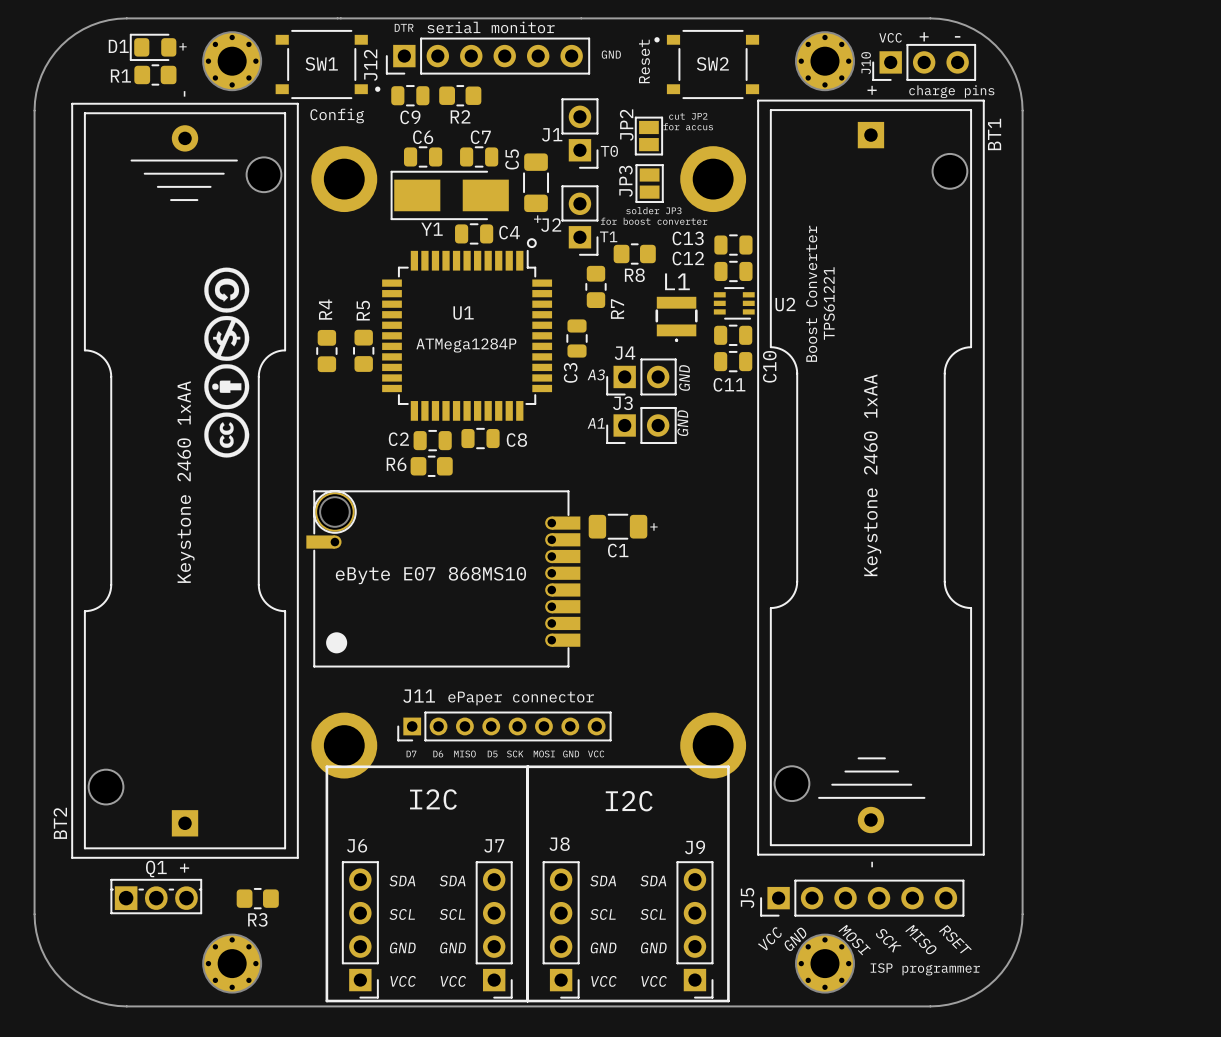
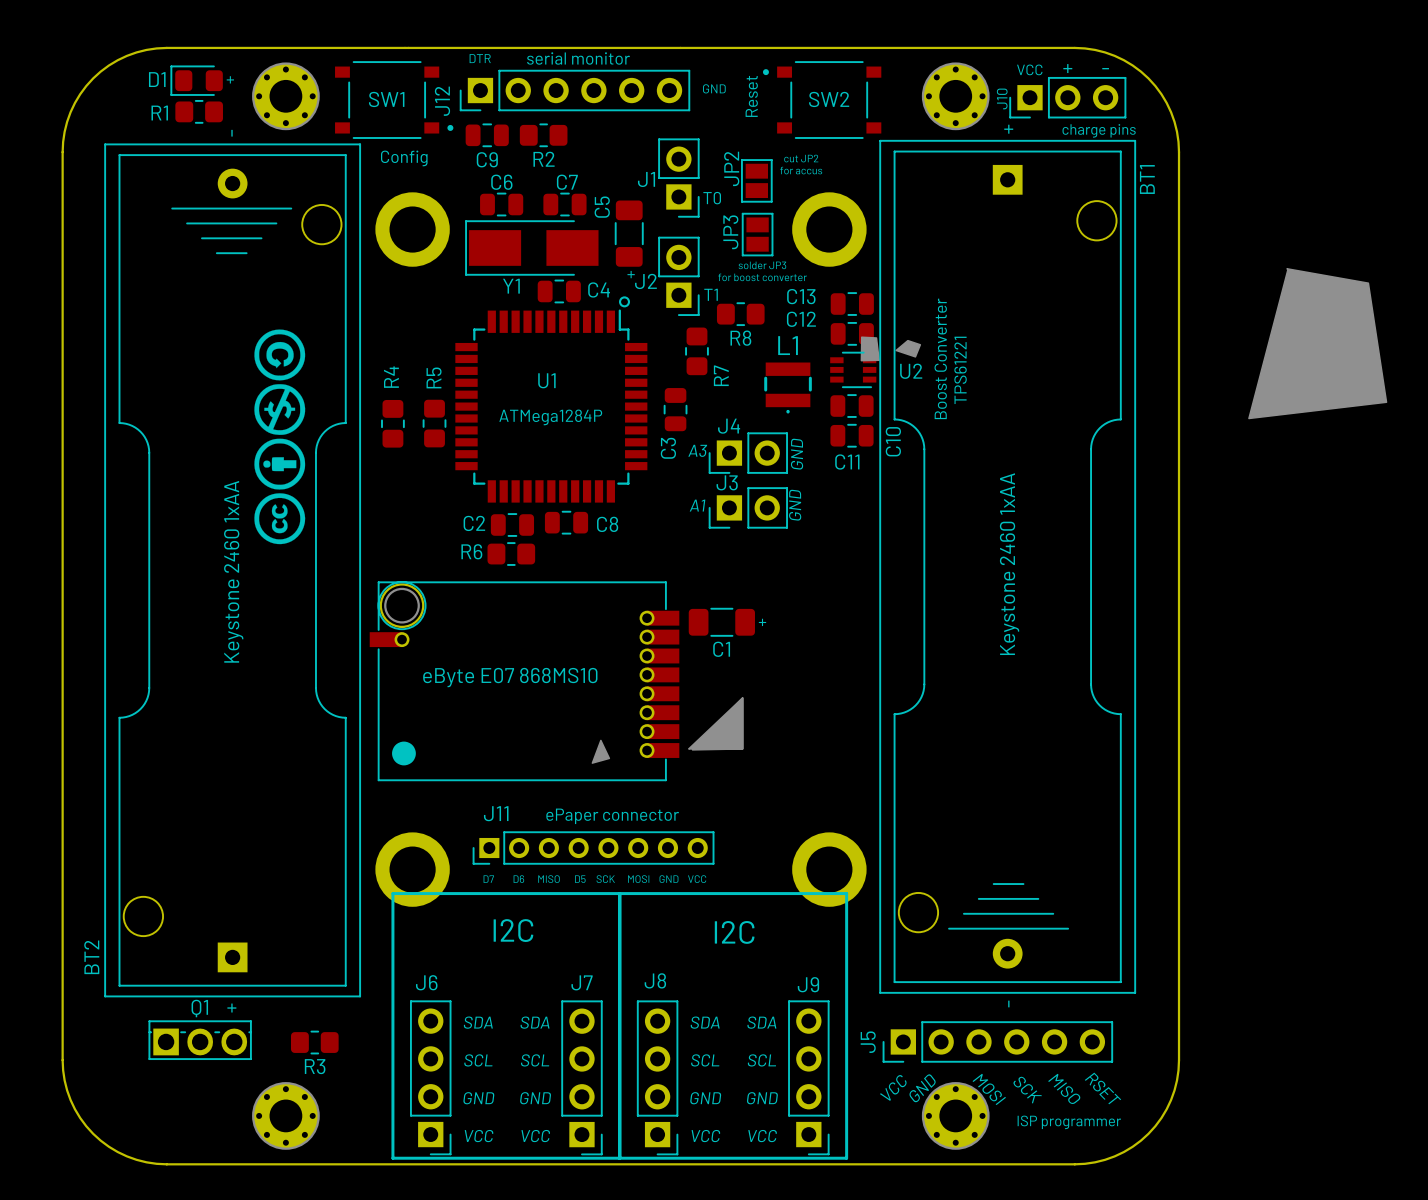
drawing: none -> [1248, 268, 1388, 420]
drawing: none -> [860, 336, 922, 362]
drawing: none -> [688, 697, 744, 751]
drawing: none -> [591, 739, 611, 764]

